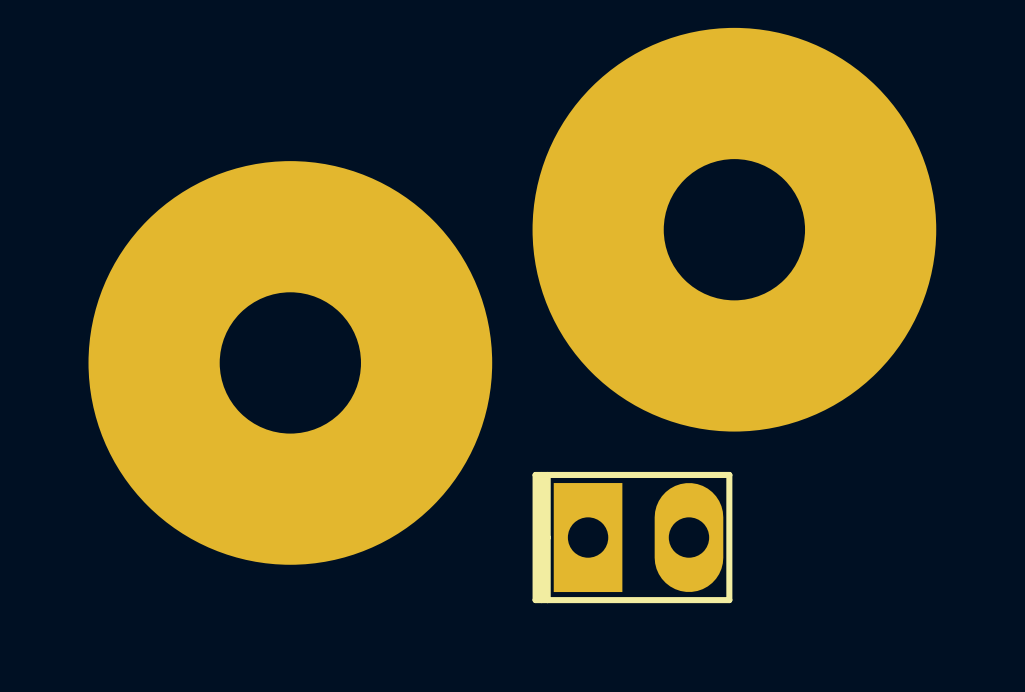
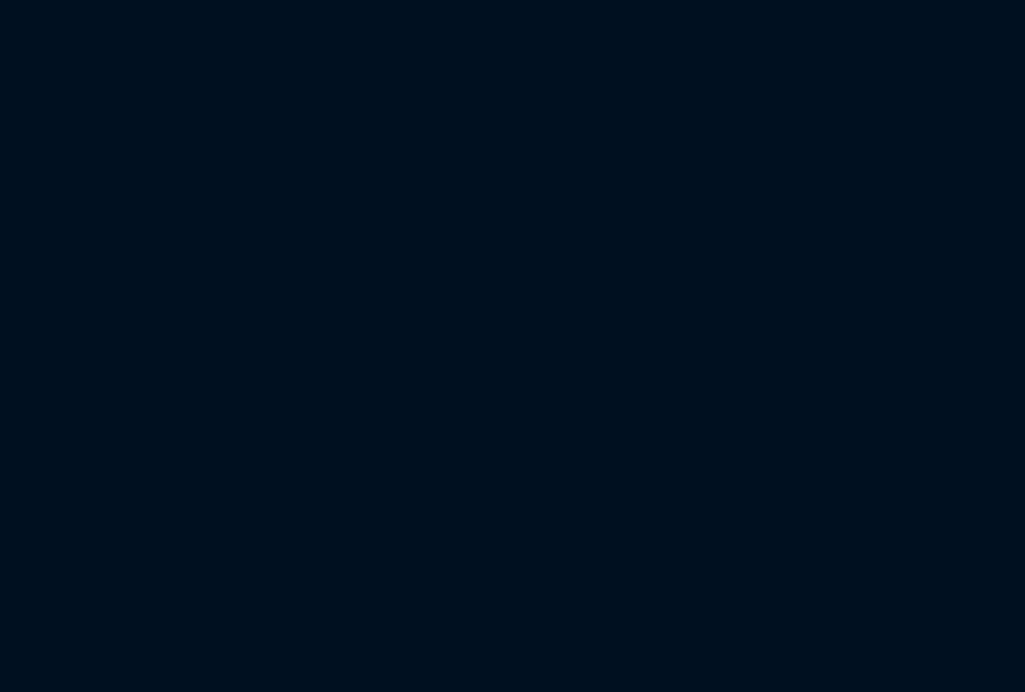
part: (734, 229) -> none
part: (290, 362) -> none
part: (632, 537) -> none

